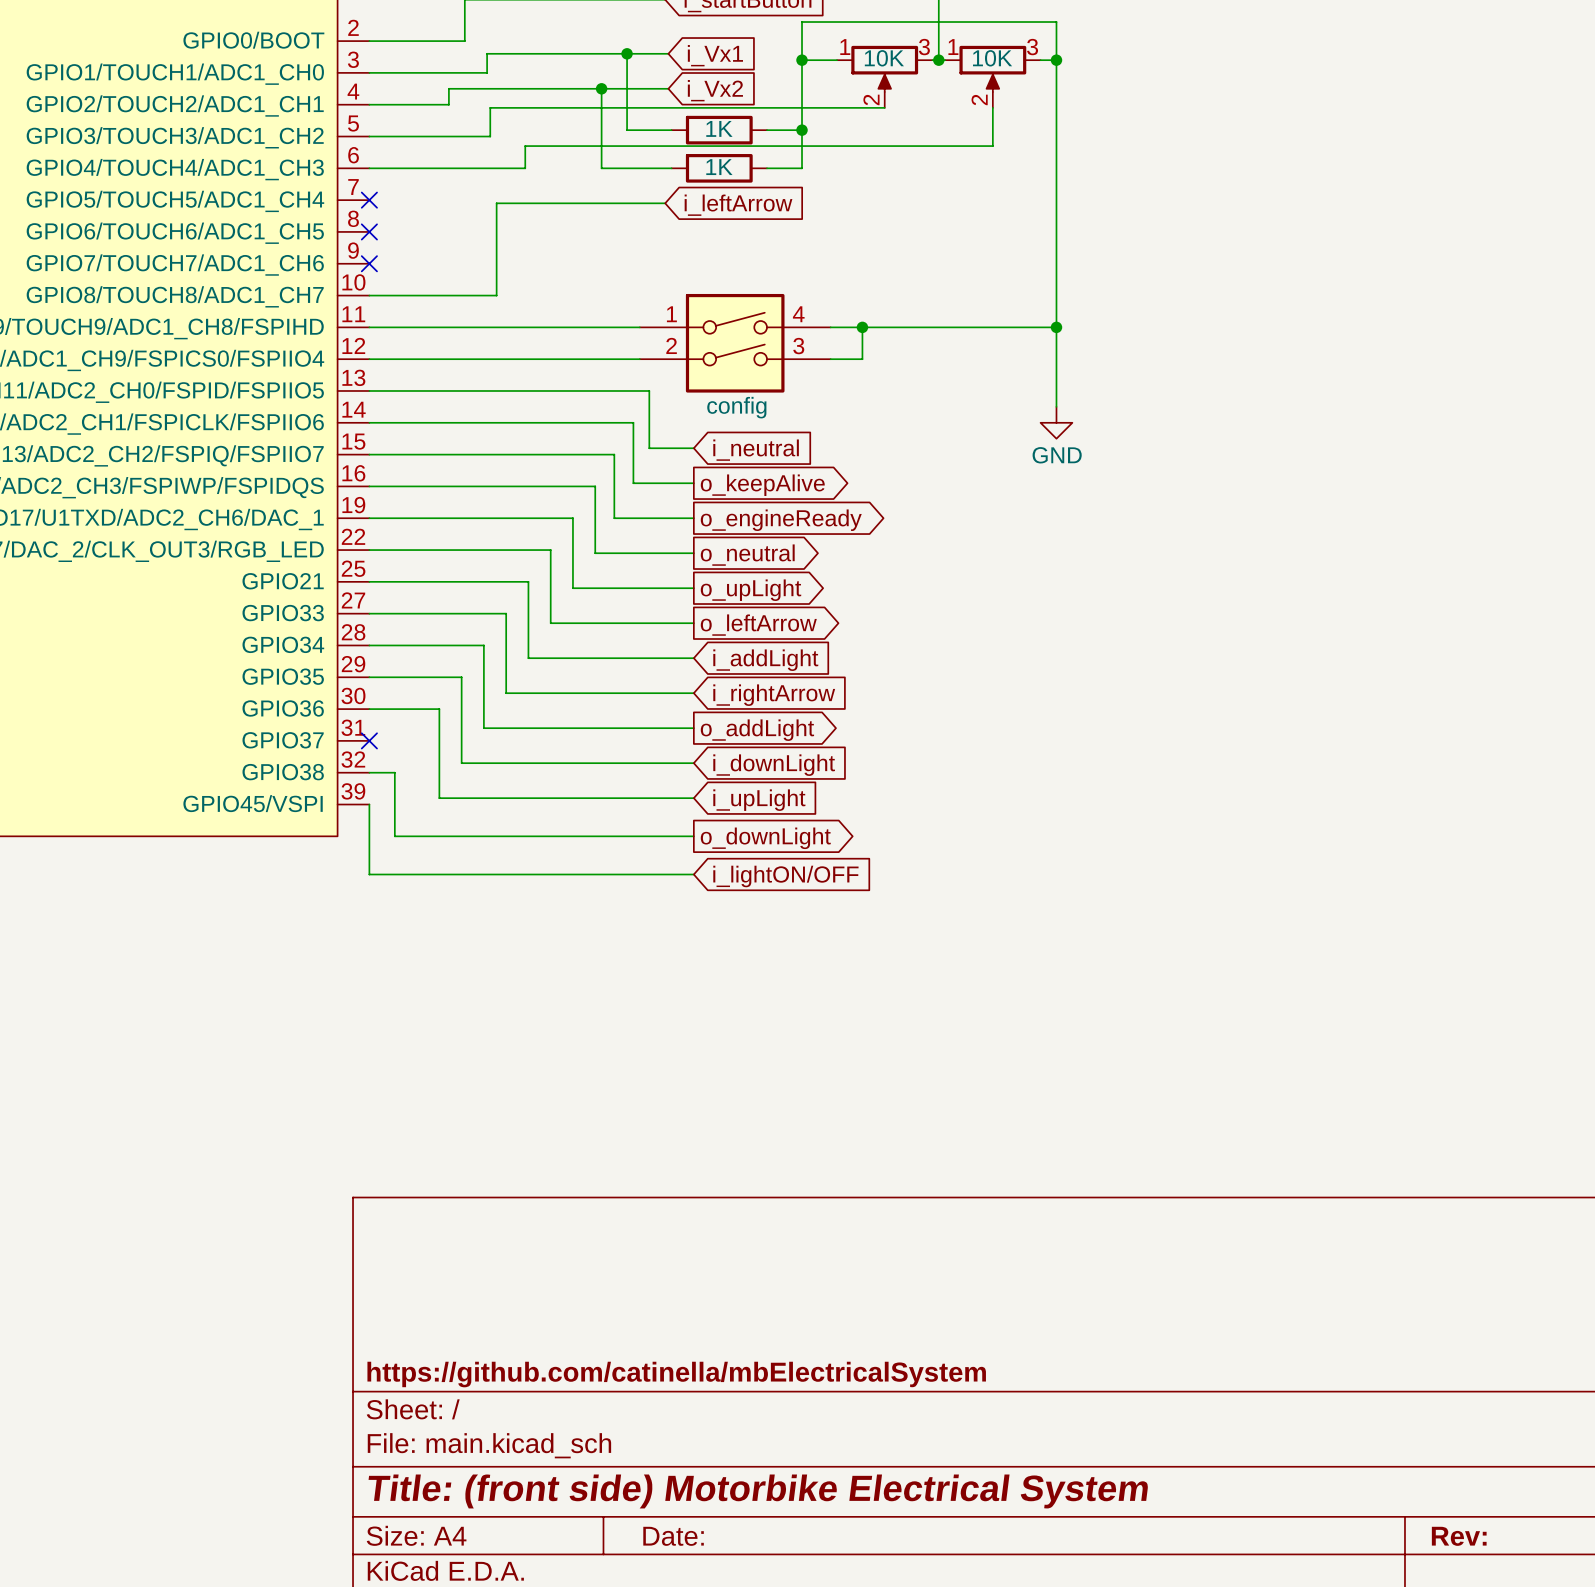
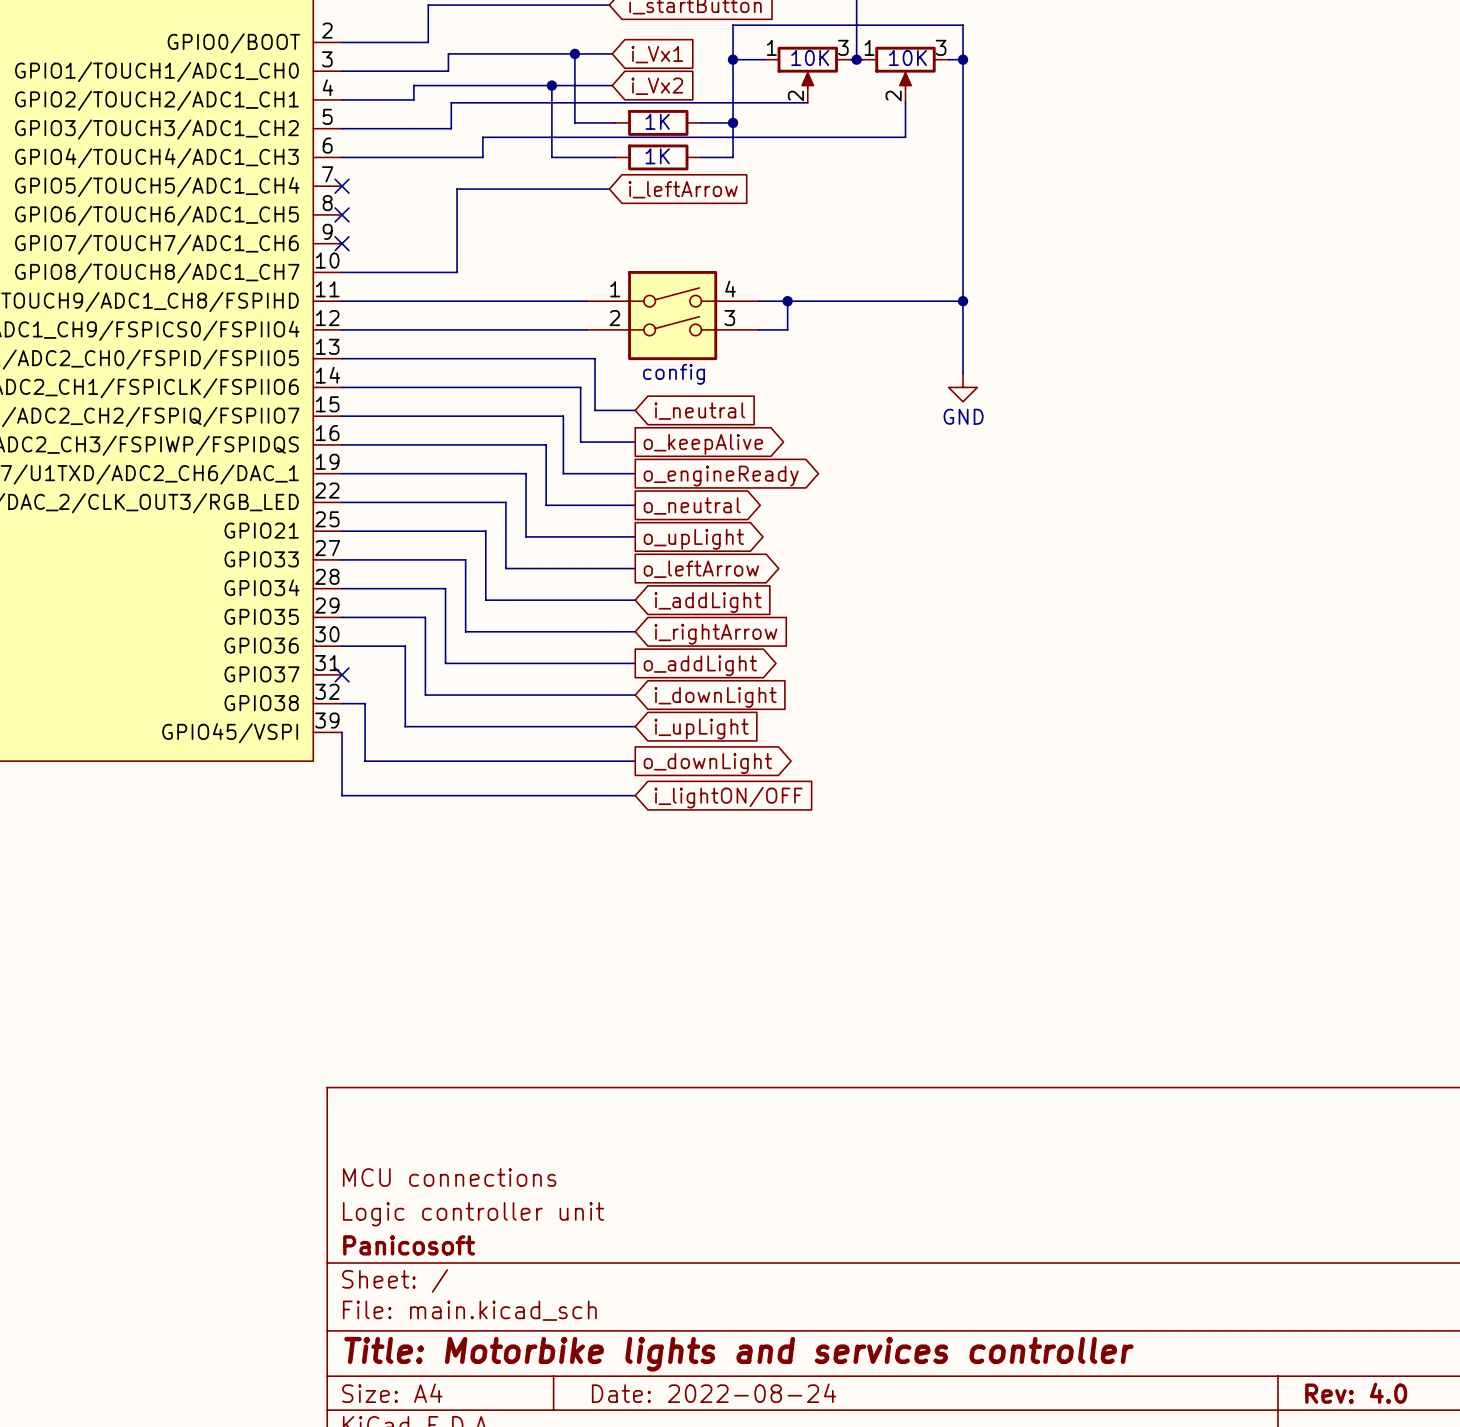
title block: none -> MCU connections (449, 1177)
title block: none -> Logic controller unit (473, 1214)
title block: https://github.com/catinella/mbElectricalSystem (676, 1374) -> Panicosoft (409, 1245)
title block: Title: (front side) Motorbike Electrical System (758, 1491) -> Title: Motorbike lights and services controller (738, 1354)
title block: Date: (673, 1536) -> Date: 2022-08-24 (714, 1393)
title block: Rev: (1459, 1536) -> Rev: 4.0 (1356, 1393)

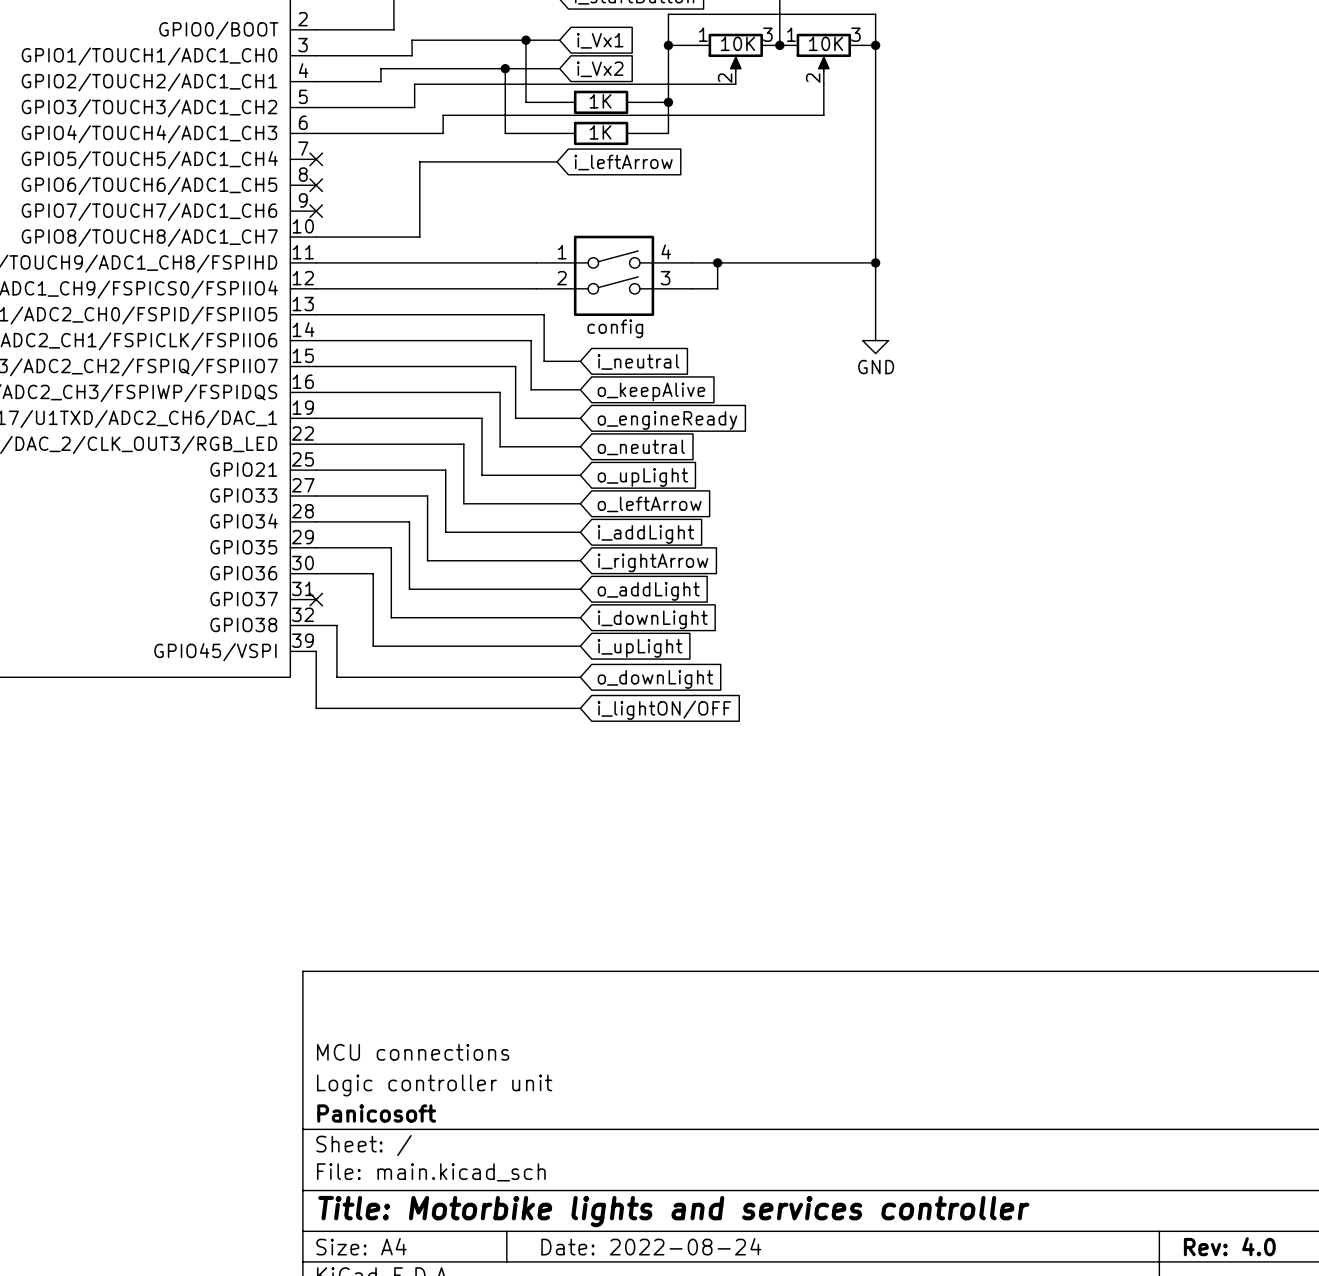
global label shape: output (703, 444) -> input (651, 391)
global label shape: output (721, 476) -> input (667, 420)
global label shape: output (692, 505) -> input (641, 447)
global label shape: output (693, 539) -> input (642, 477)
global label shape: output (701, 569) -> input (649, 504)
global label shape: output (700, 665) -> input (648, 591)
global label shape: output (707, 763) -> input (655, 679)

